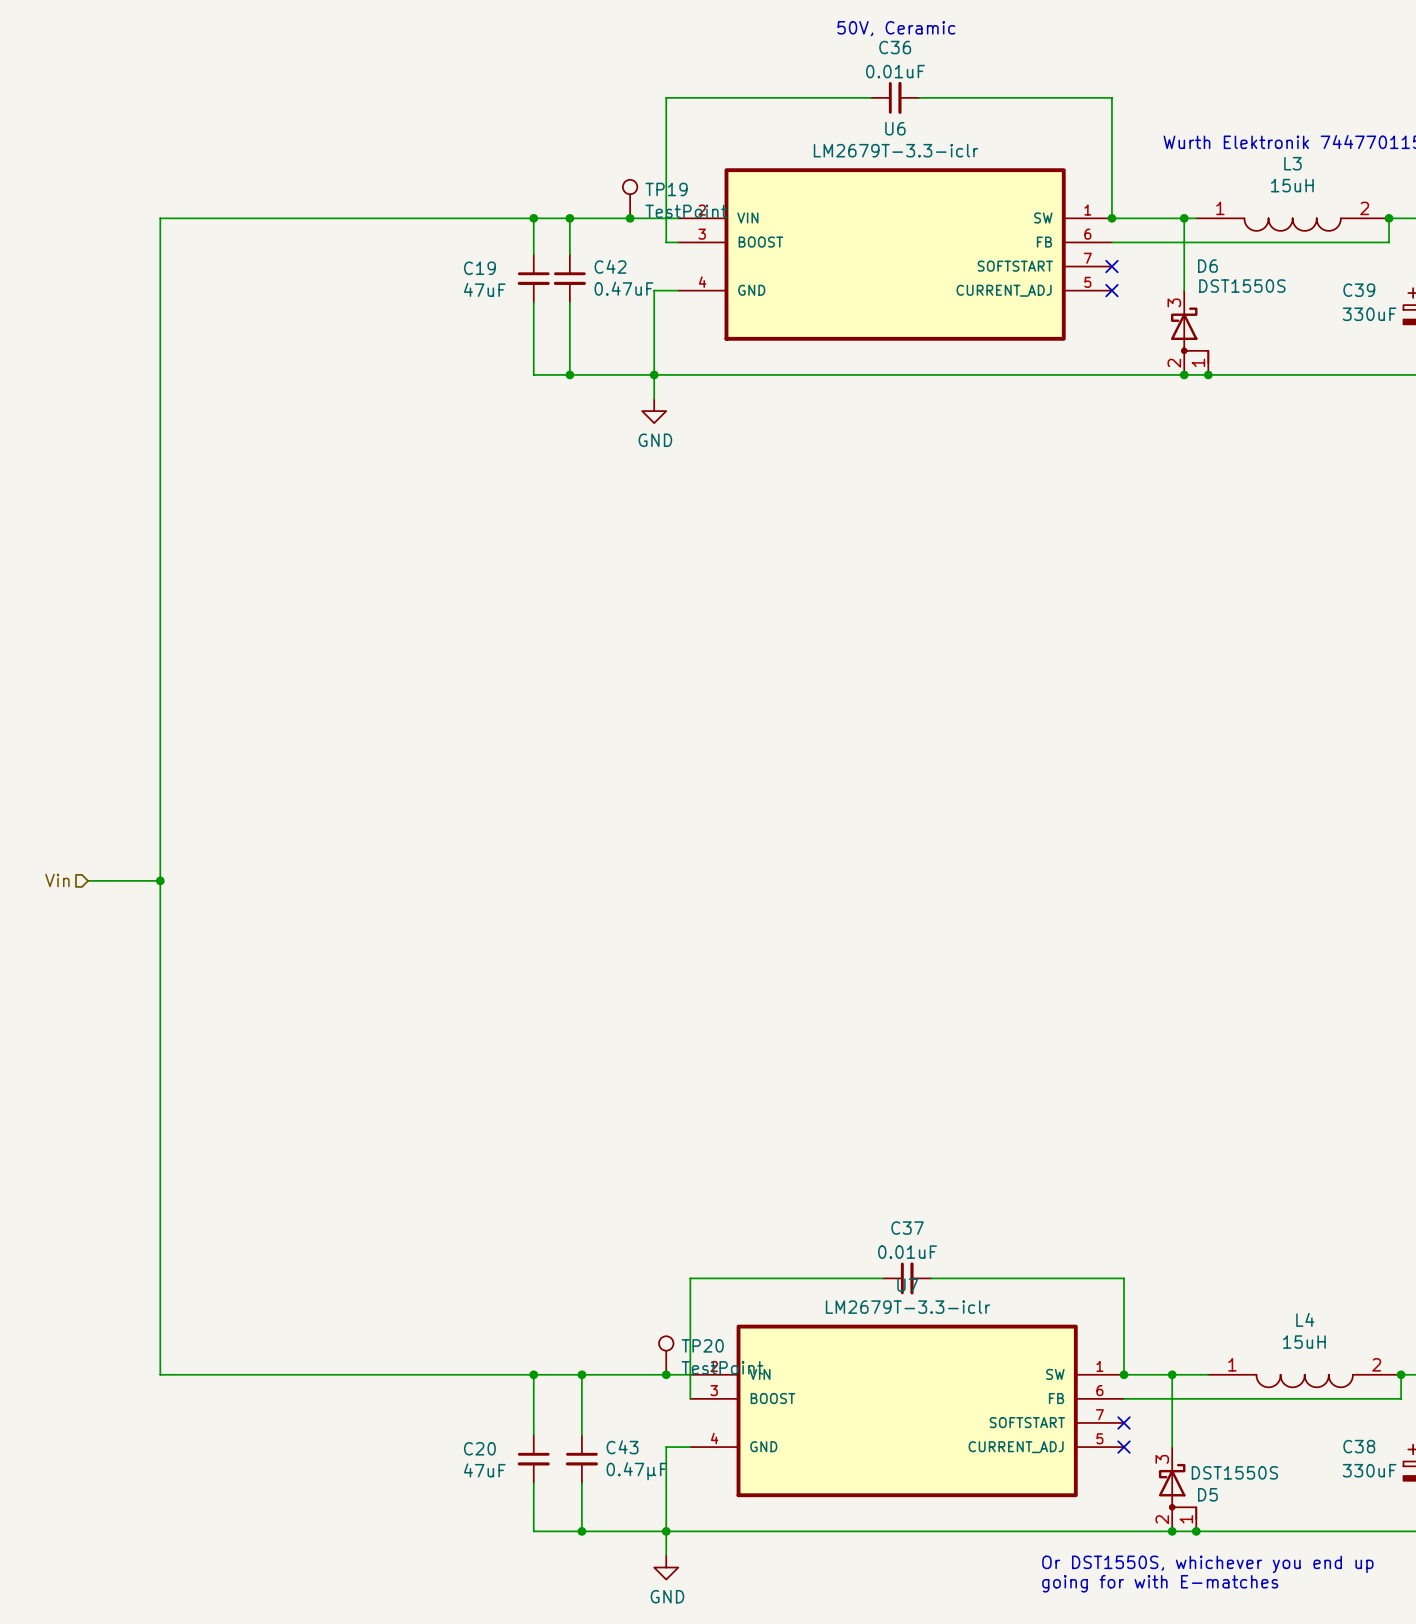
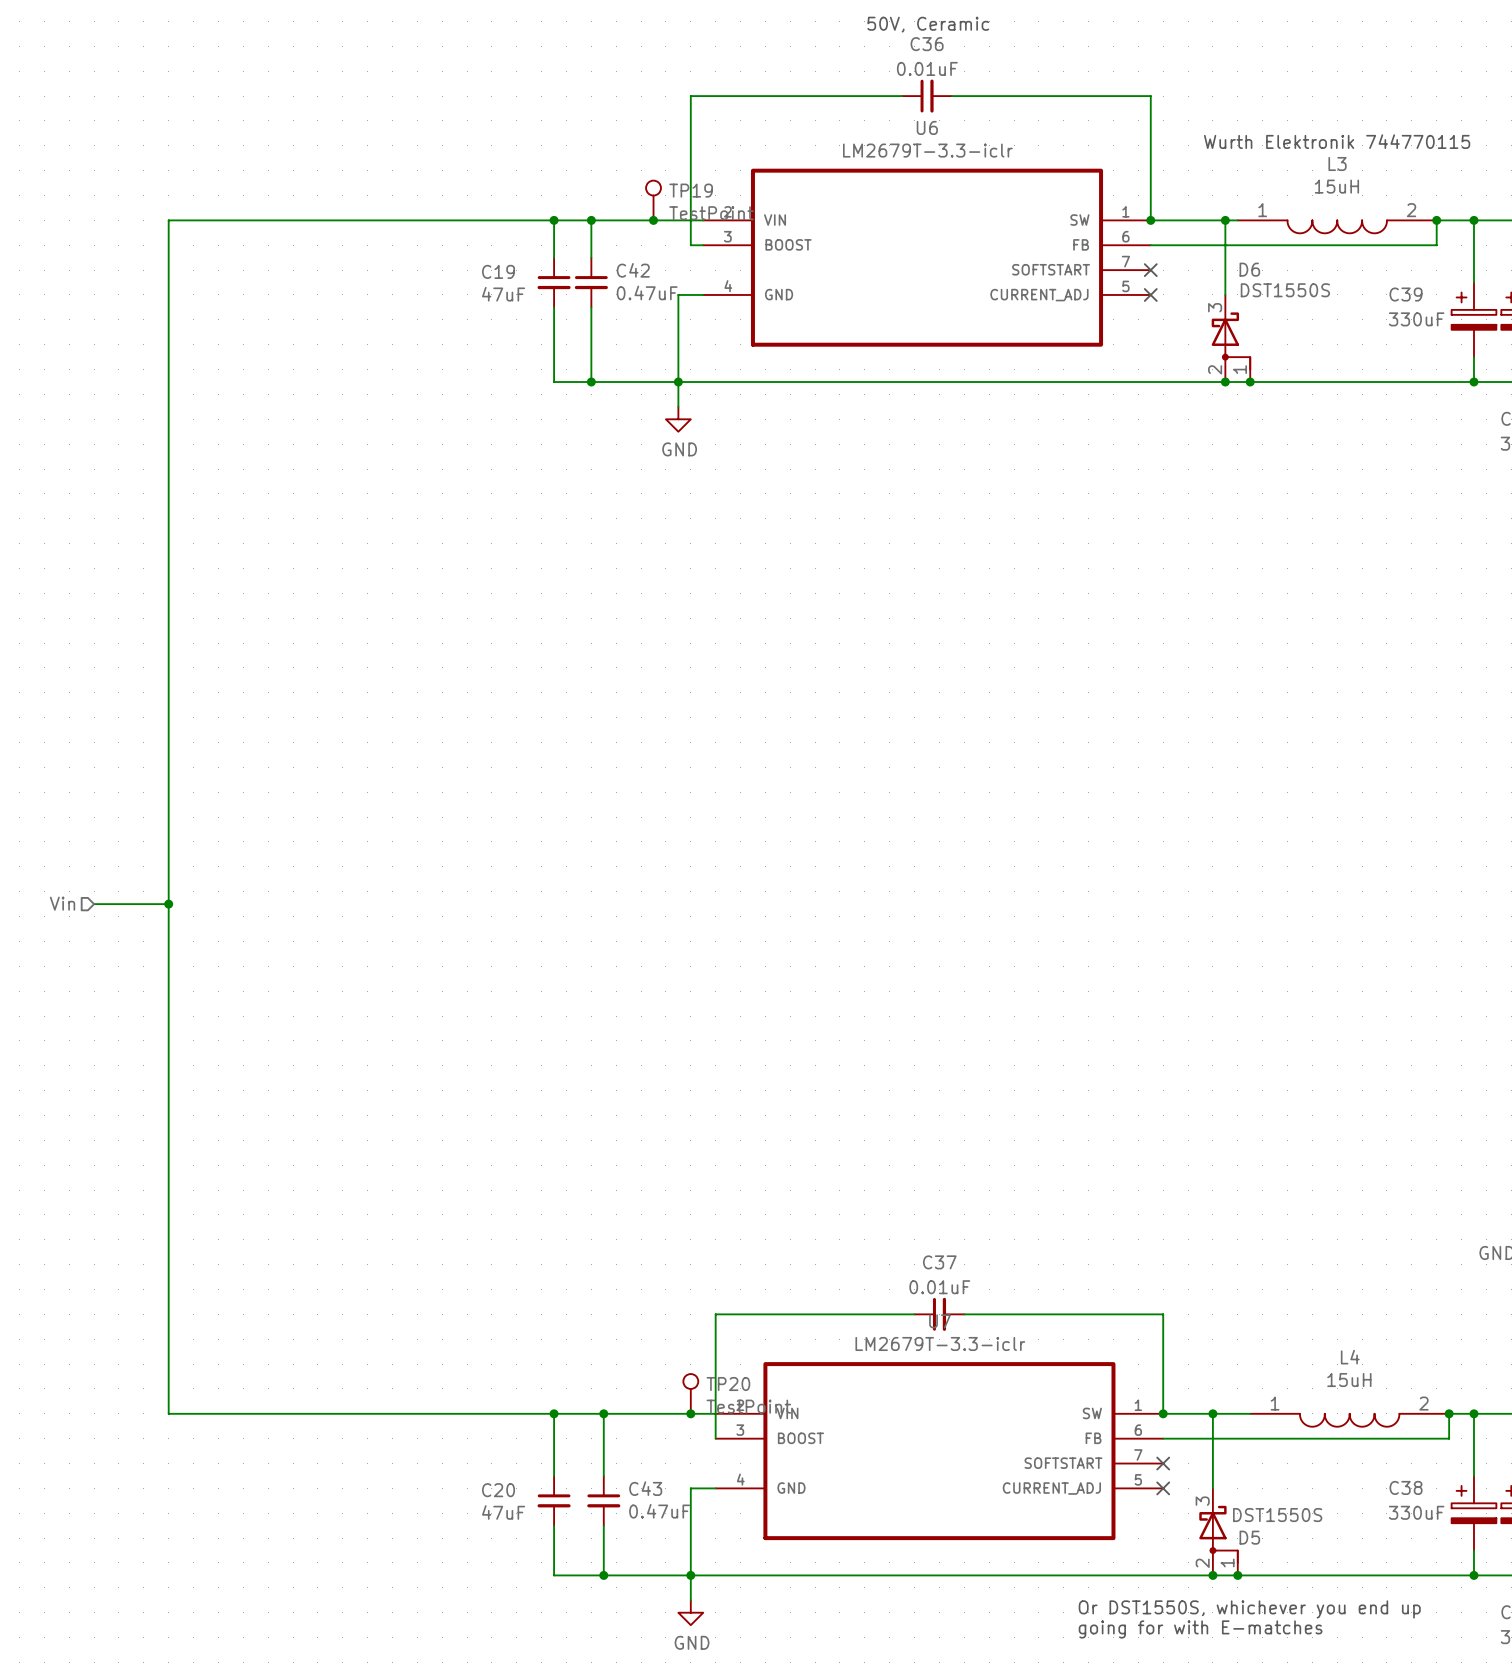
C43 value: 0.47μF (636, 1471) -> 0.47uF (659, 1511)

